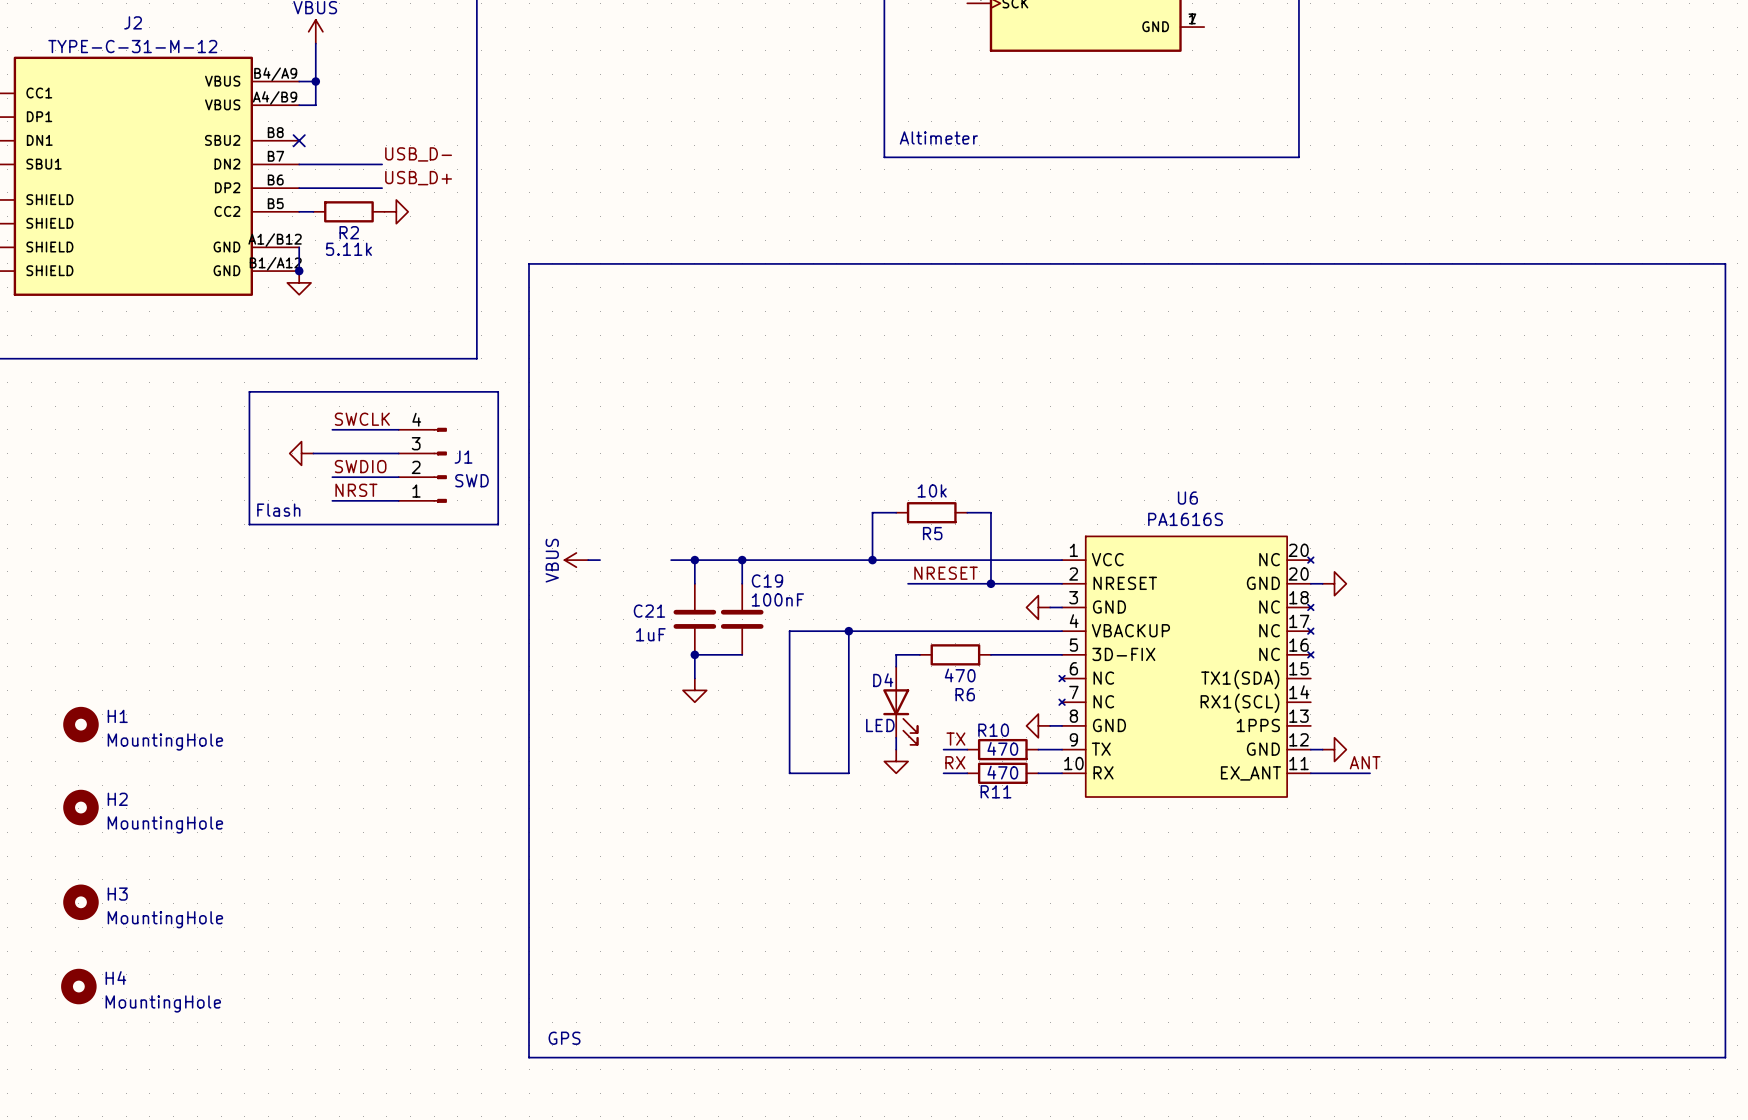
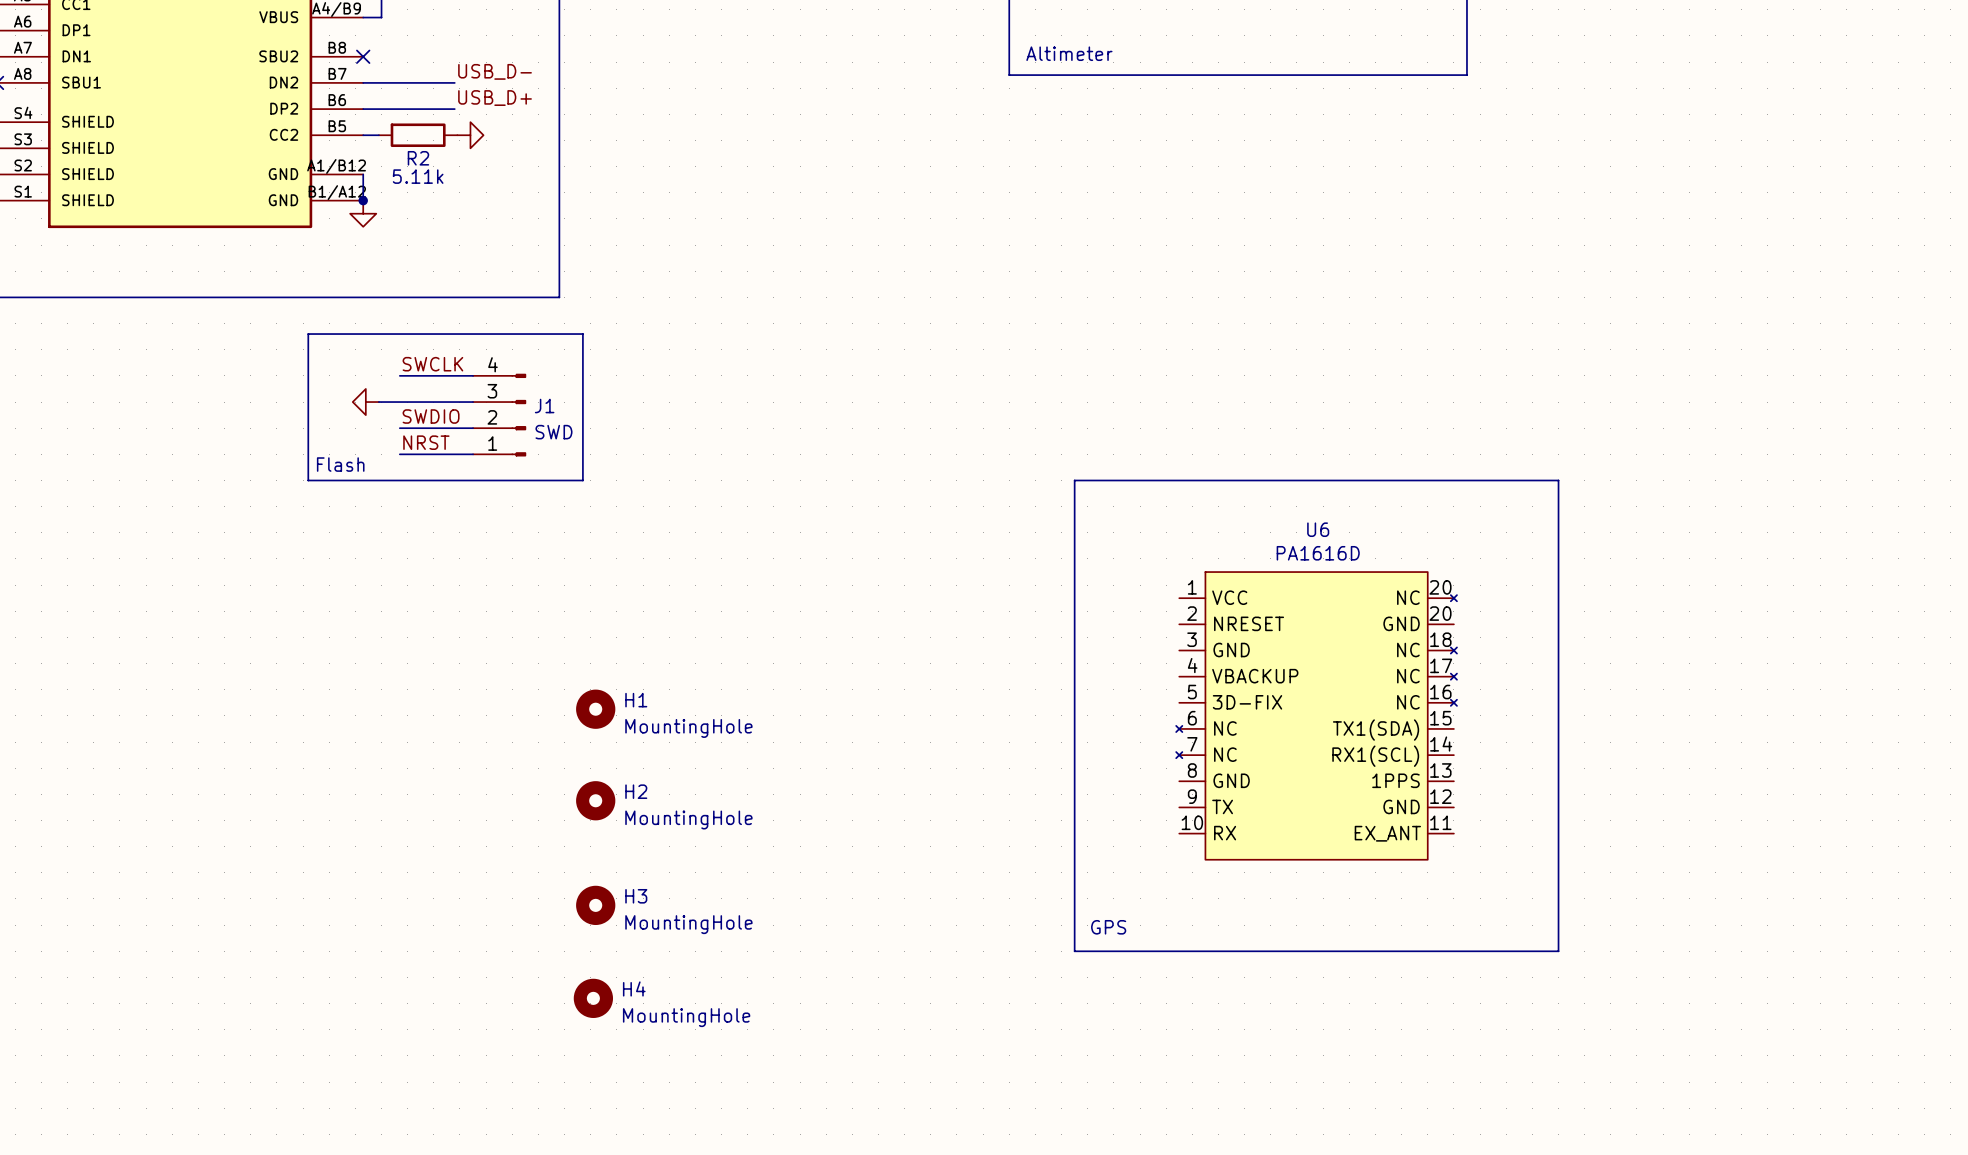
line: (529, 263) (1725, 263) (1725, 1057) (529, 1057) (529, 263) -> none
wire: (896, 512) (872, 512) (872, 560) -> none
R5: 10k (931, 512) -> none
wire: (967, 512) (990, 512) (990, 583) -> none
text: PA1616S (1185, 519) -> none
line: none -> (1074, 480) (1558, 480) (1558, 951) (1074, 951) (1074, 480)
power symbol: VBUS (576, 560) -> none
wire: (588, 560) (600, 560) -> none
wire: (671, 560) (1062, 560) -> none
wire: (694, 560) (694, 583) -> none
junction: (694, 560) -> none
wire: (742, 560) (742, 583) -> none
junction: (742, 560) -> none
junction: (872, 560) -> none
label: NRESET (946, 573) -> none
wire: (908, 583) (1062, 583) -> none
junction: (990, 583) -> none
wire: (1310, 583) (1322, 583) -> none
power symbol: (1334, 583) -> none
text: none -> PA1616D (1318, 553)
power symbol: (1038, 607) -> none
wire: (1050, 607) (1062, 607) -> none
C21: 1uF (694, 619) -> none
C19: 100nF (742, 619) -> none
wire: (848, 631) (848, 773) (789, 773) (789, 631) (1062, 631) -> none
junction: (848, 631) -> none
junction: (694, 654) -> none
wire: (742, 654) (694, 654) (694, 678) -> none
wire: (919, 654) (896, 654) (896, 666) -> none
R6: 470 (955, 654) -> none
wire: (990, 654) (1062, 654) -> none
U6 position: (1164, 666) -> (1291, 715)
power symbol: (694, 690) -> none
D4: LED (900, 705) -> none
H1 position: (80, 724) -> (595, 709)
power symbol: (1038, 725) -> none
wire: (896, 737) (896, 749) -> none
label: TX (955, 739) -> none
wire: (943, 749) (967, 749) -> none
R10: 470 (1002, 749) -> none
wire: (1310, 749) (1322, 749) -> none
power symbol: (1334, 749) -> none
power symbol: (896, 761) -> none
label: RX (955, 762) -> none
label: ANT (1365, 762) -> none
wire: (943, 773) (967, 773) -> none
R11: 470 (1002, 773) -> none
wire: (1310, 773) (1370, 773) -> none
H2 position: (80, 807) -> (595, 800)
H3 position: (80, 902) -> (595, 905)
text: none -> GPS (1108, 927)
H4 position: (78, 986) -> (593, 998)
text: GPS (564, 1038) -> none

